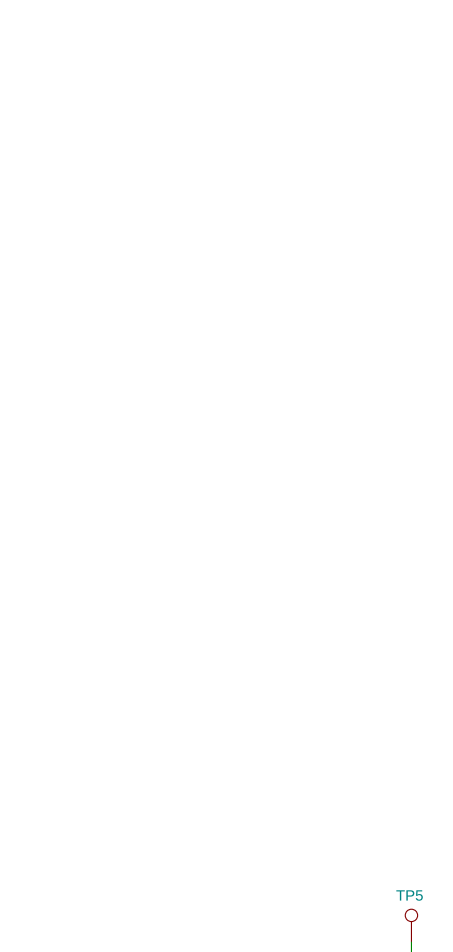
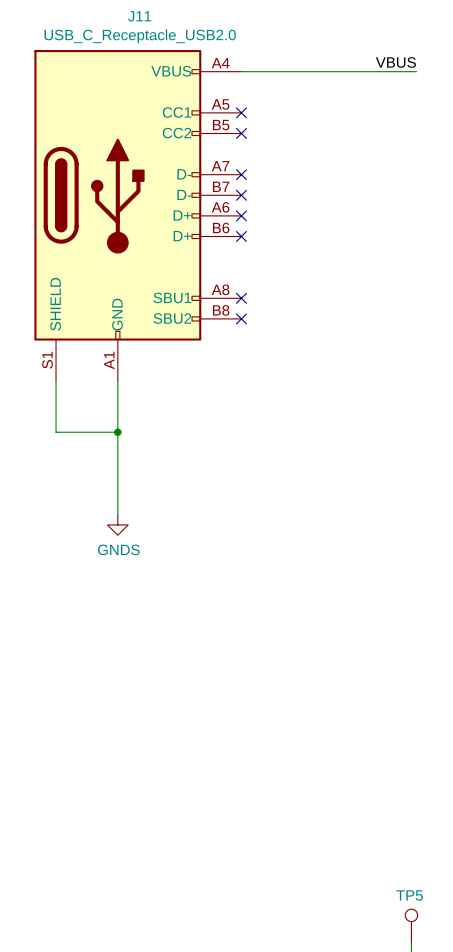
label: none -> VBUS (395, 62)
wire: none -> (241, 71) (416, 71)
no-connect mark: none -> (241, 112)
no-connect mark: none -> (241, 133)
no-connect mark: none -> (241, 174)
no-connect mark: none -> (241, 195)
J11: none -> USB_C_Receptacle_USB2.0 (137, 215)
no-connect mark: none -> (241, 215)
no-connect mark: none -> (241, 236)
no-connect mark: none -> (241, 298)
no-connect mark: none -> (241, 318)
wire: none -> (56, 380) (56, 432) (117, 432)
wire: none -> (117, 380) (117, 514)
junction: none -> (117, 432)
power symbol: none -> GNDS (117, 524)

